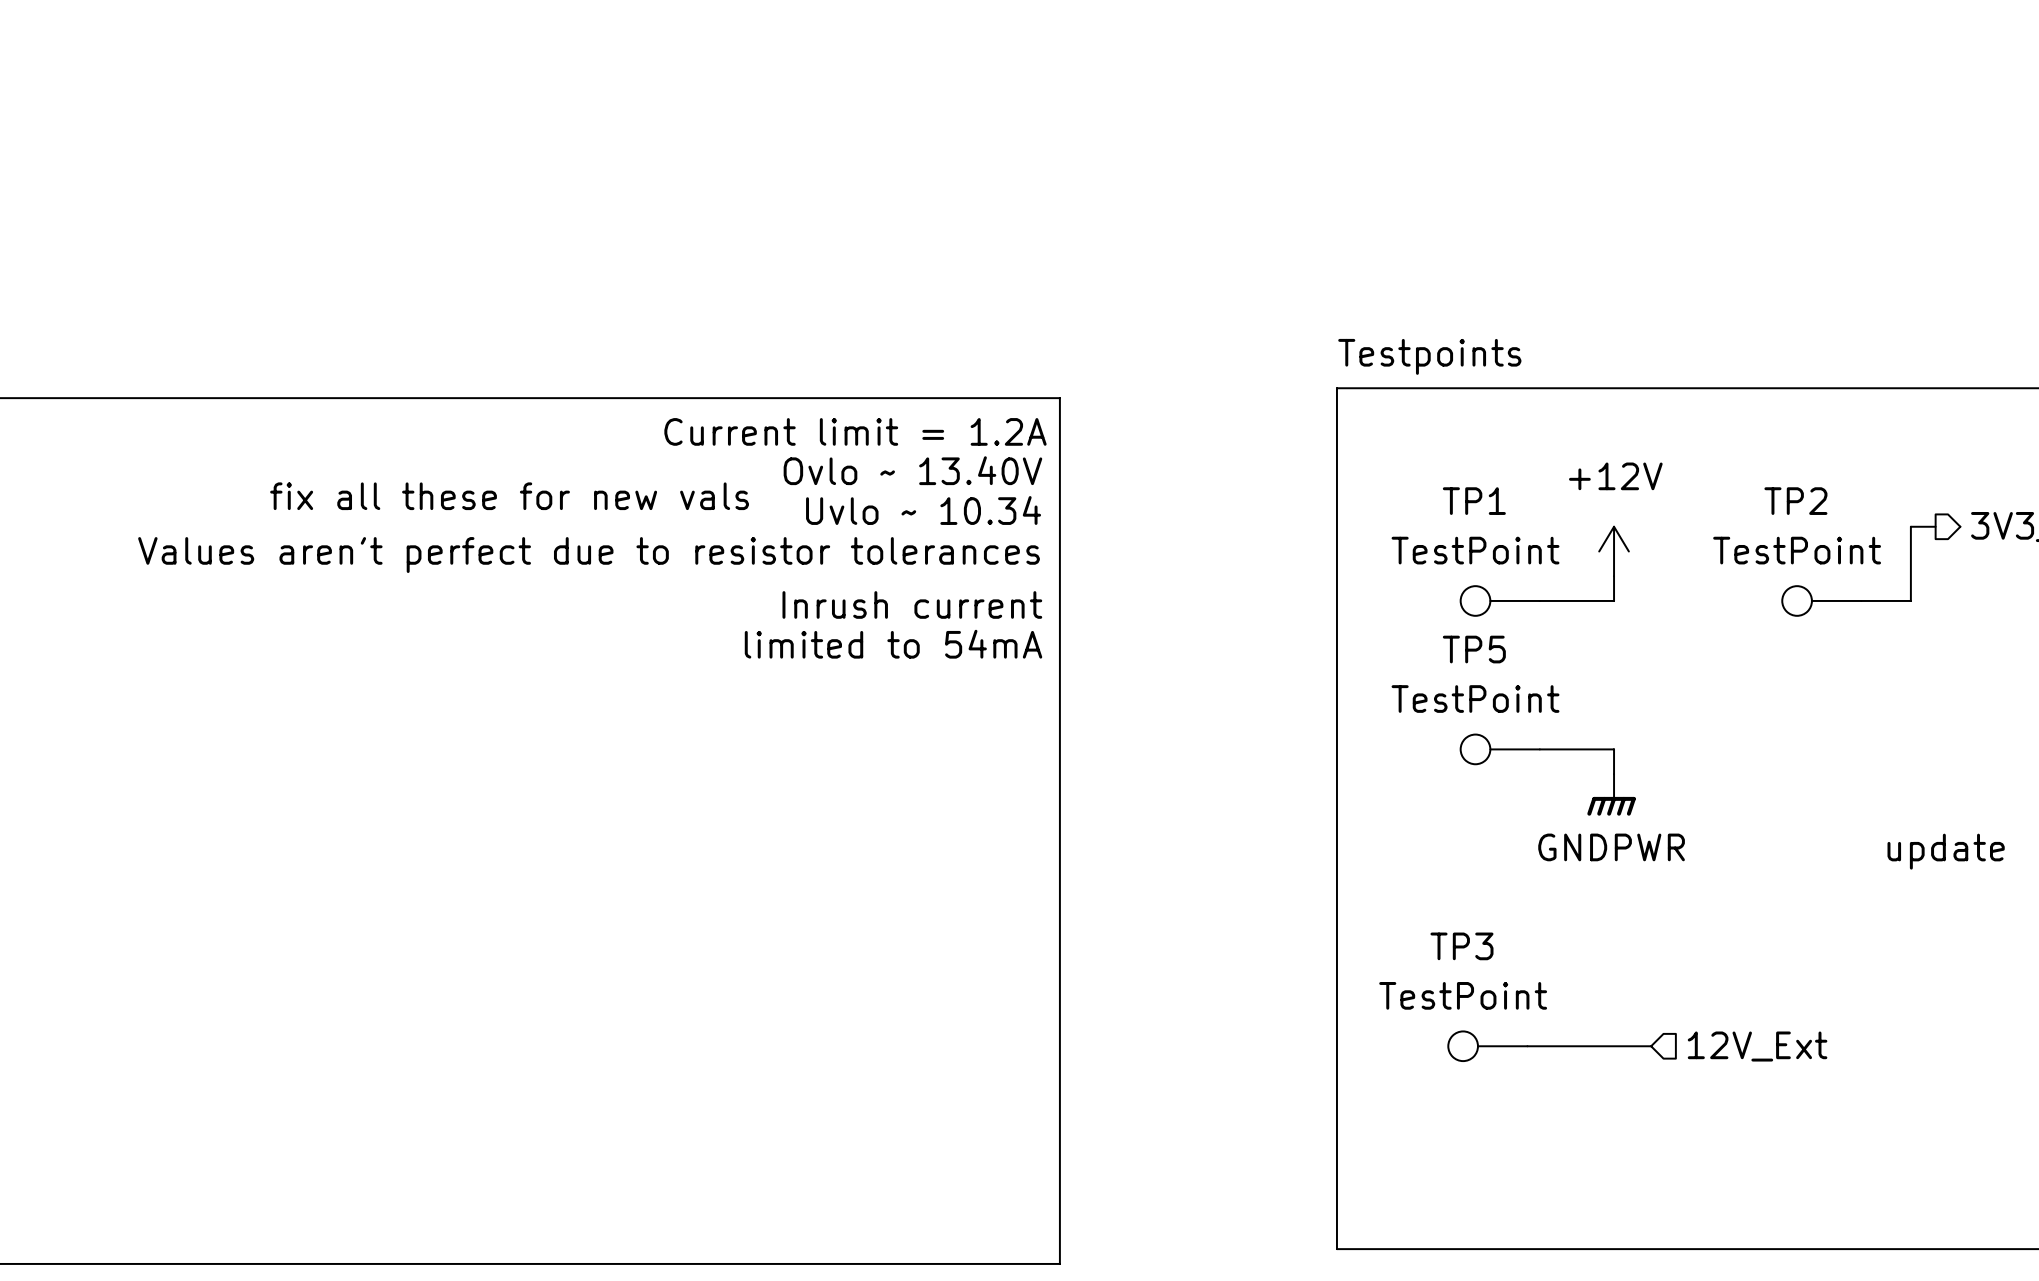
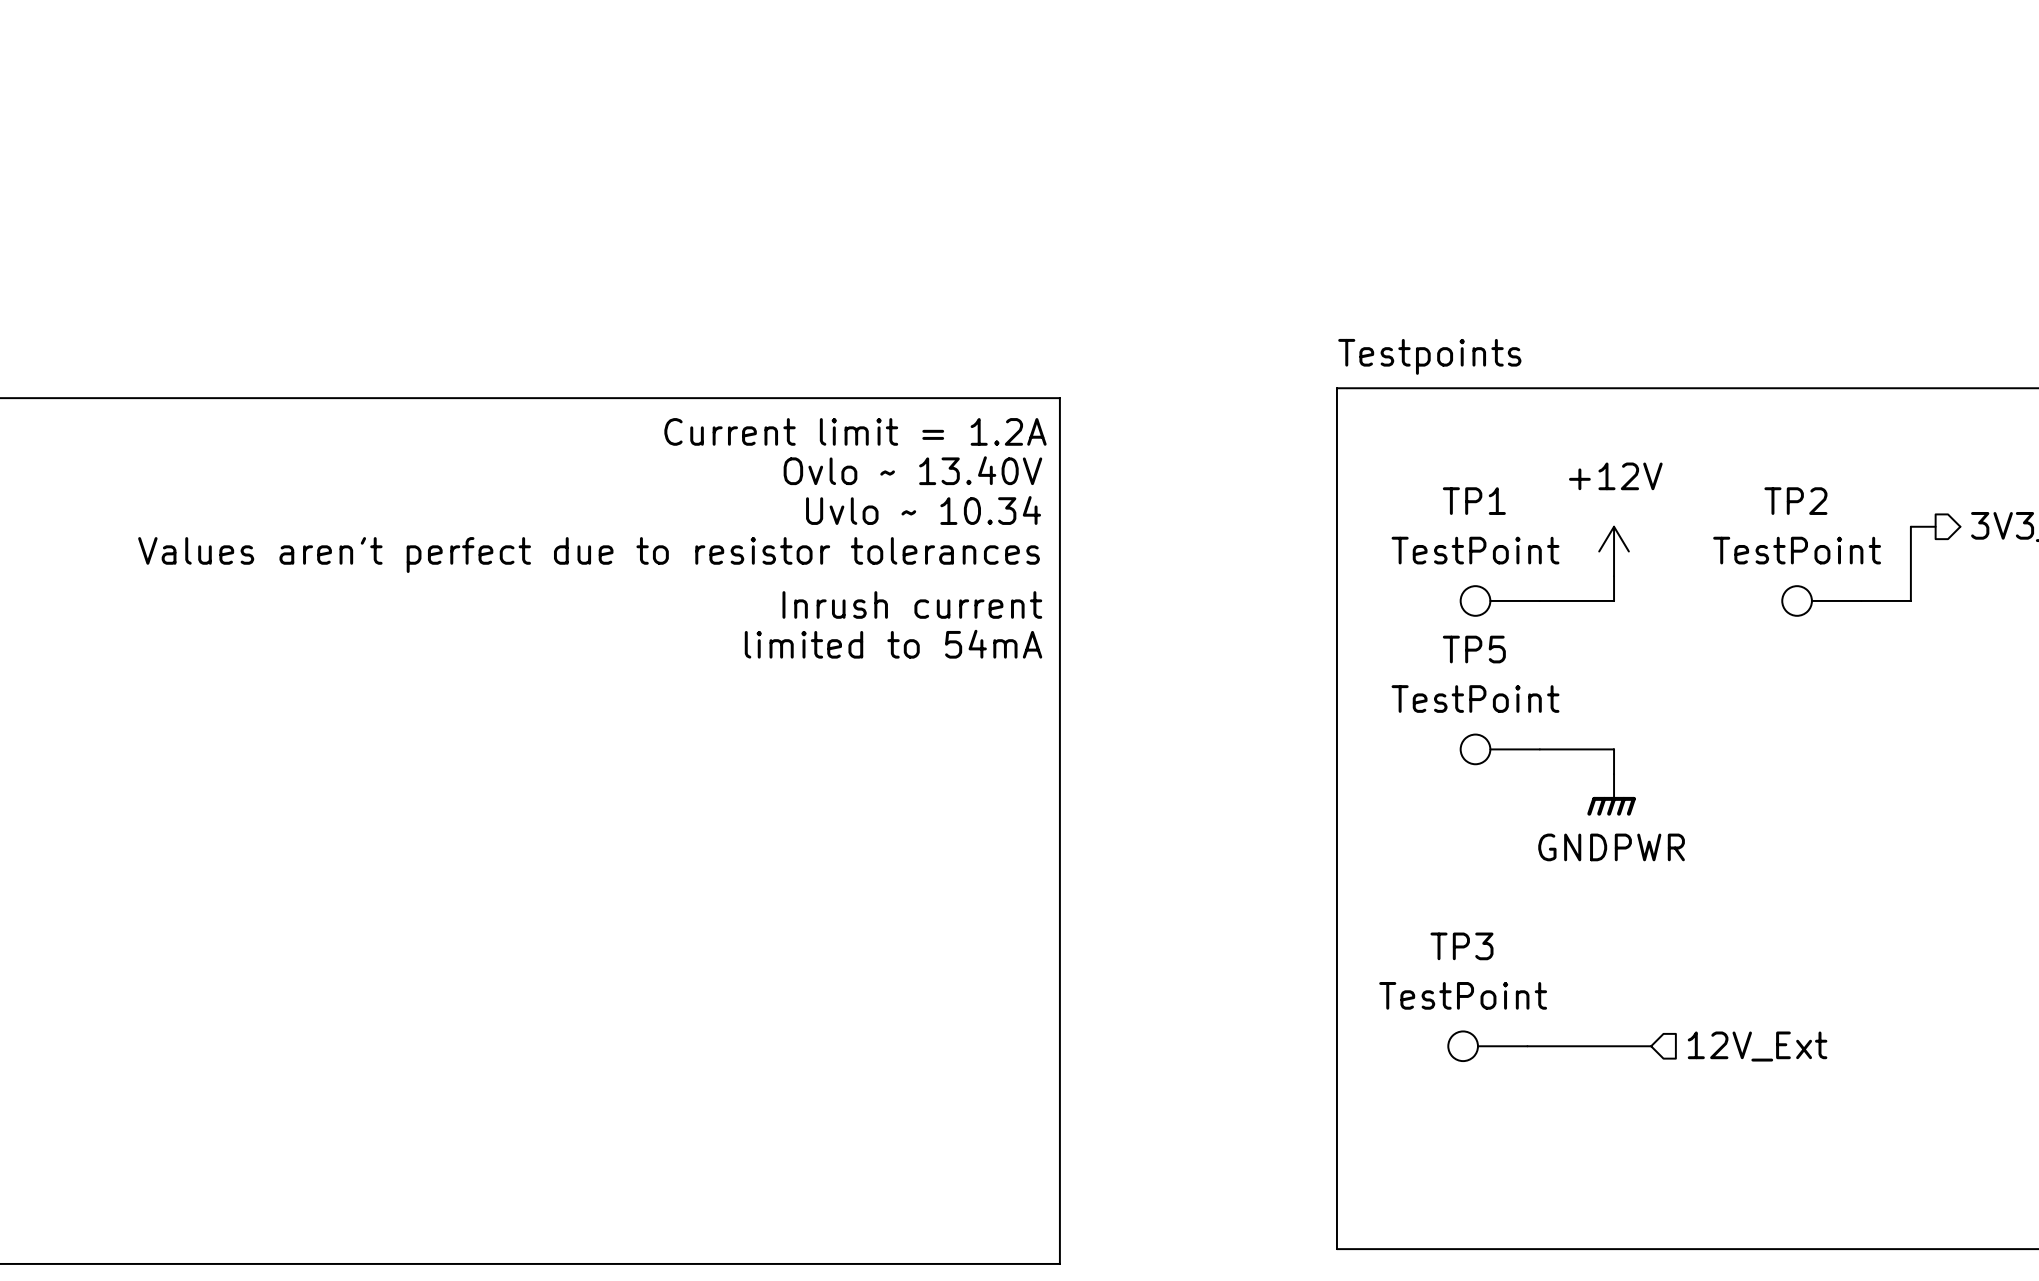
text: fix all these for new vals (509, 496) -> none
text: update (1946, 851) -> none

